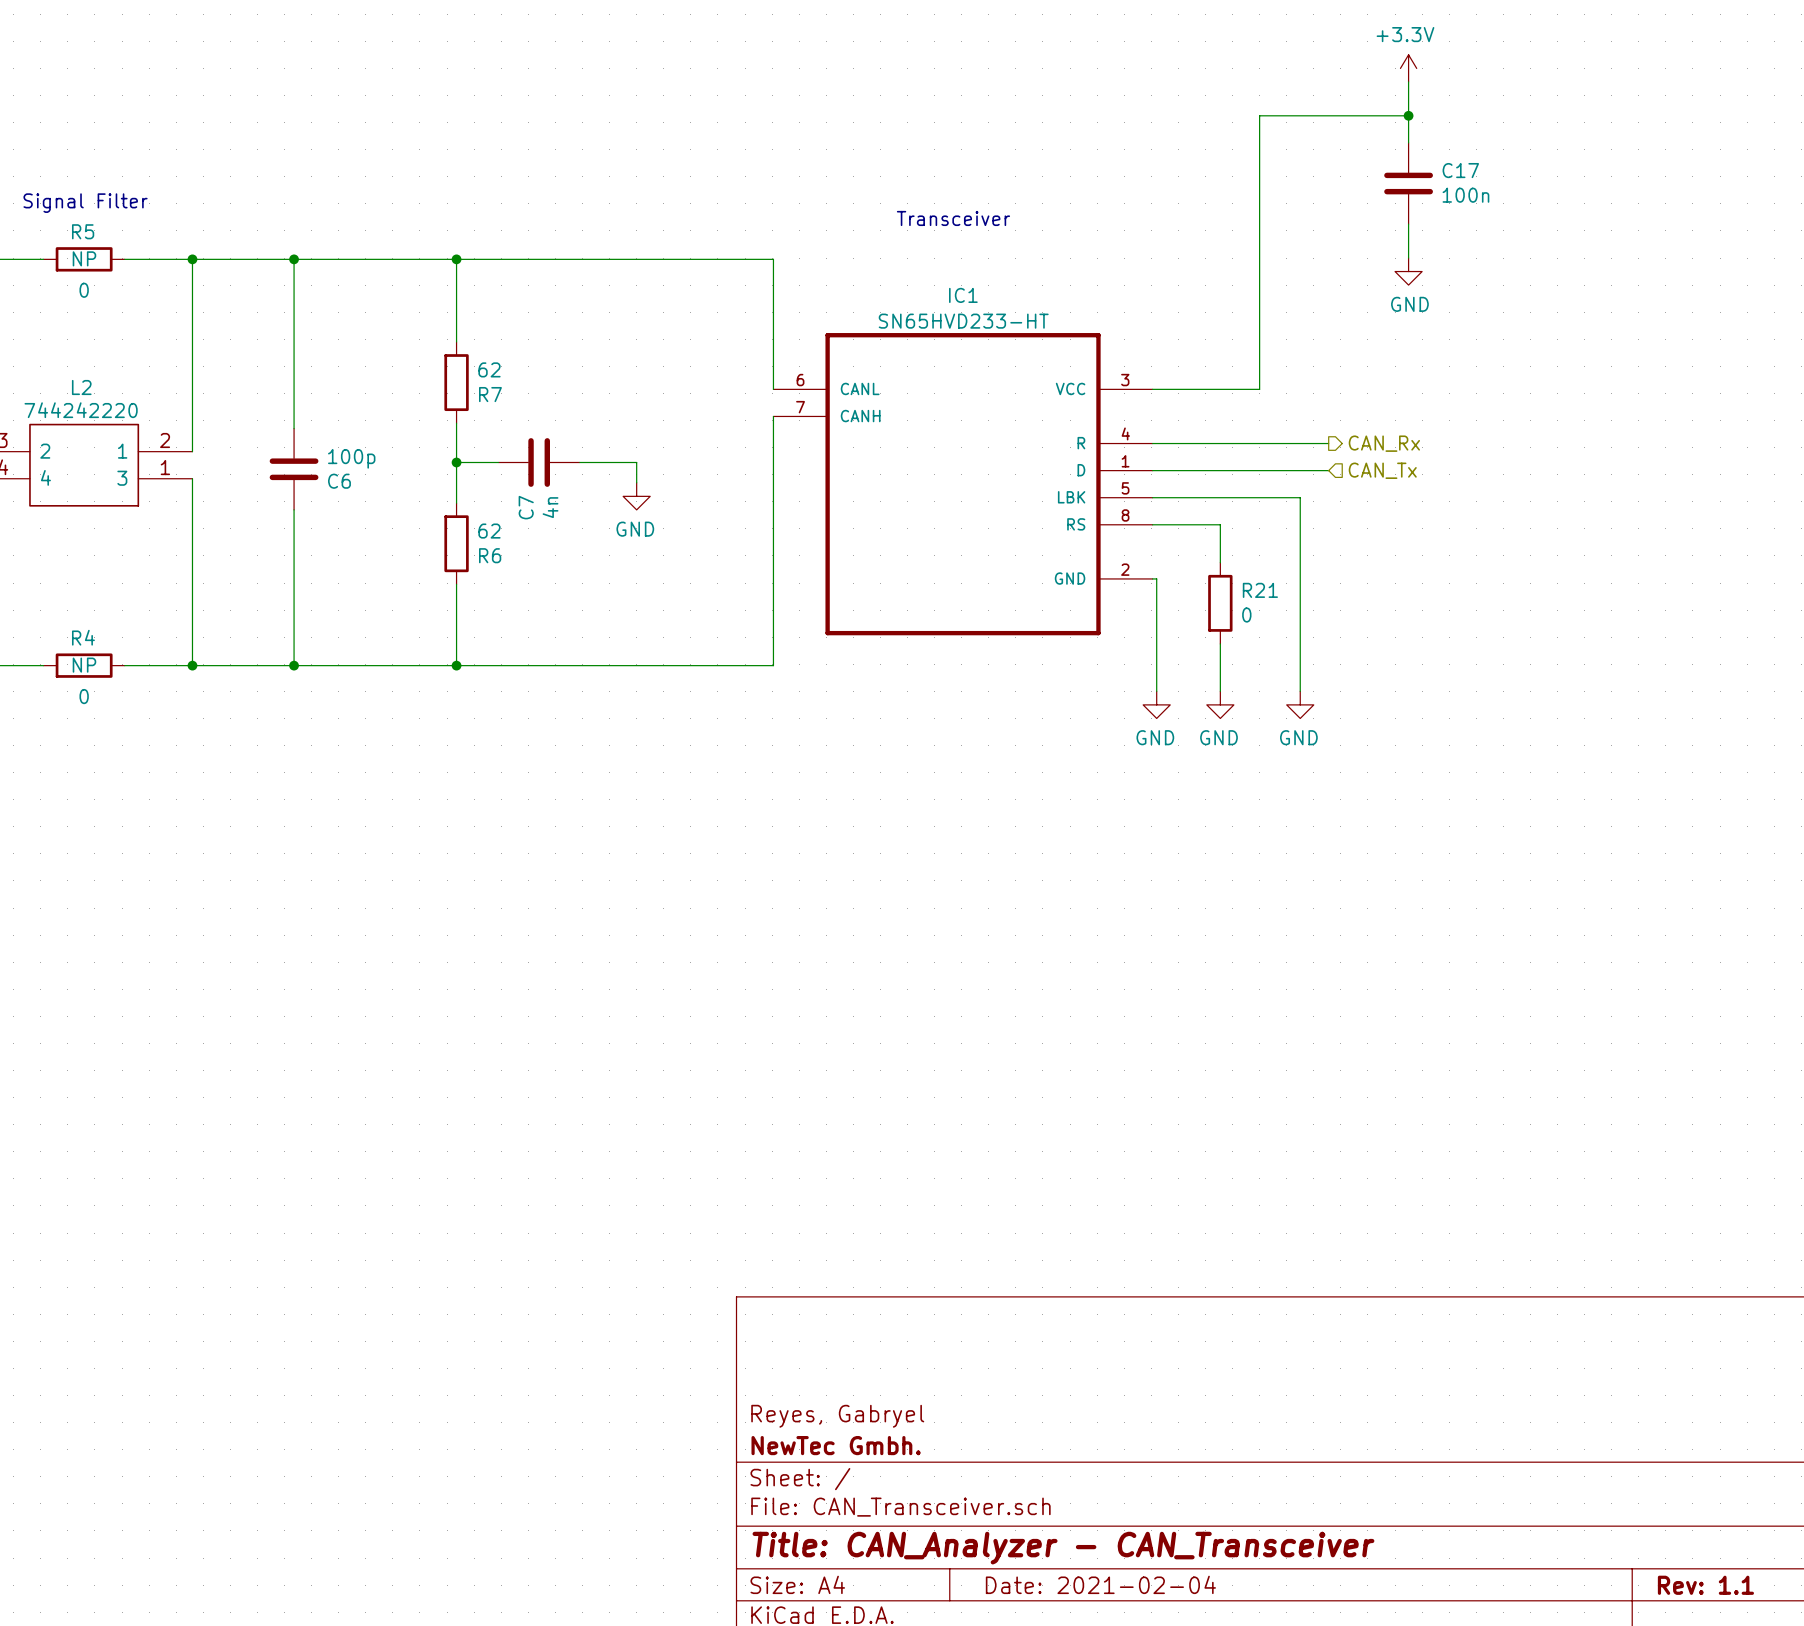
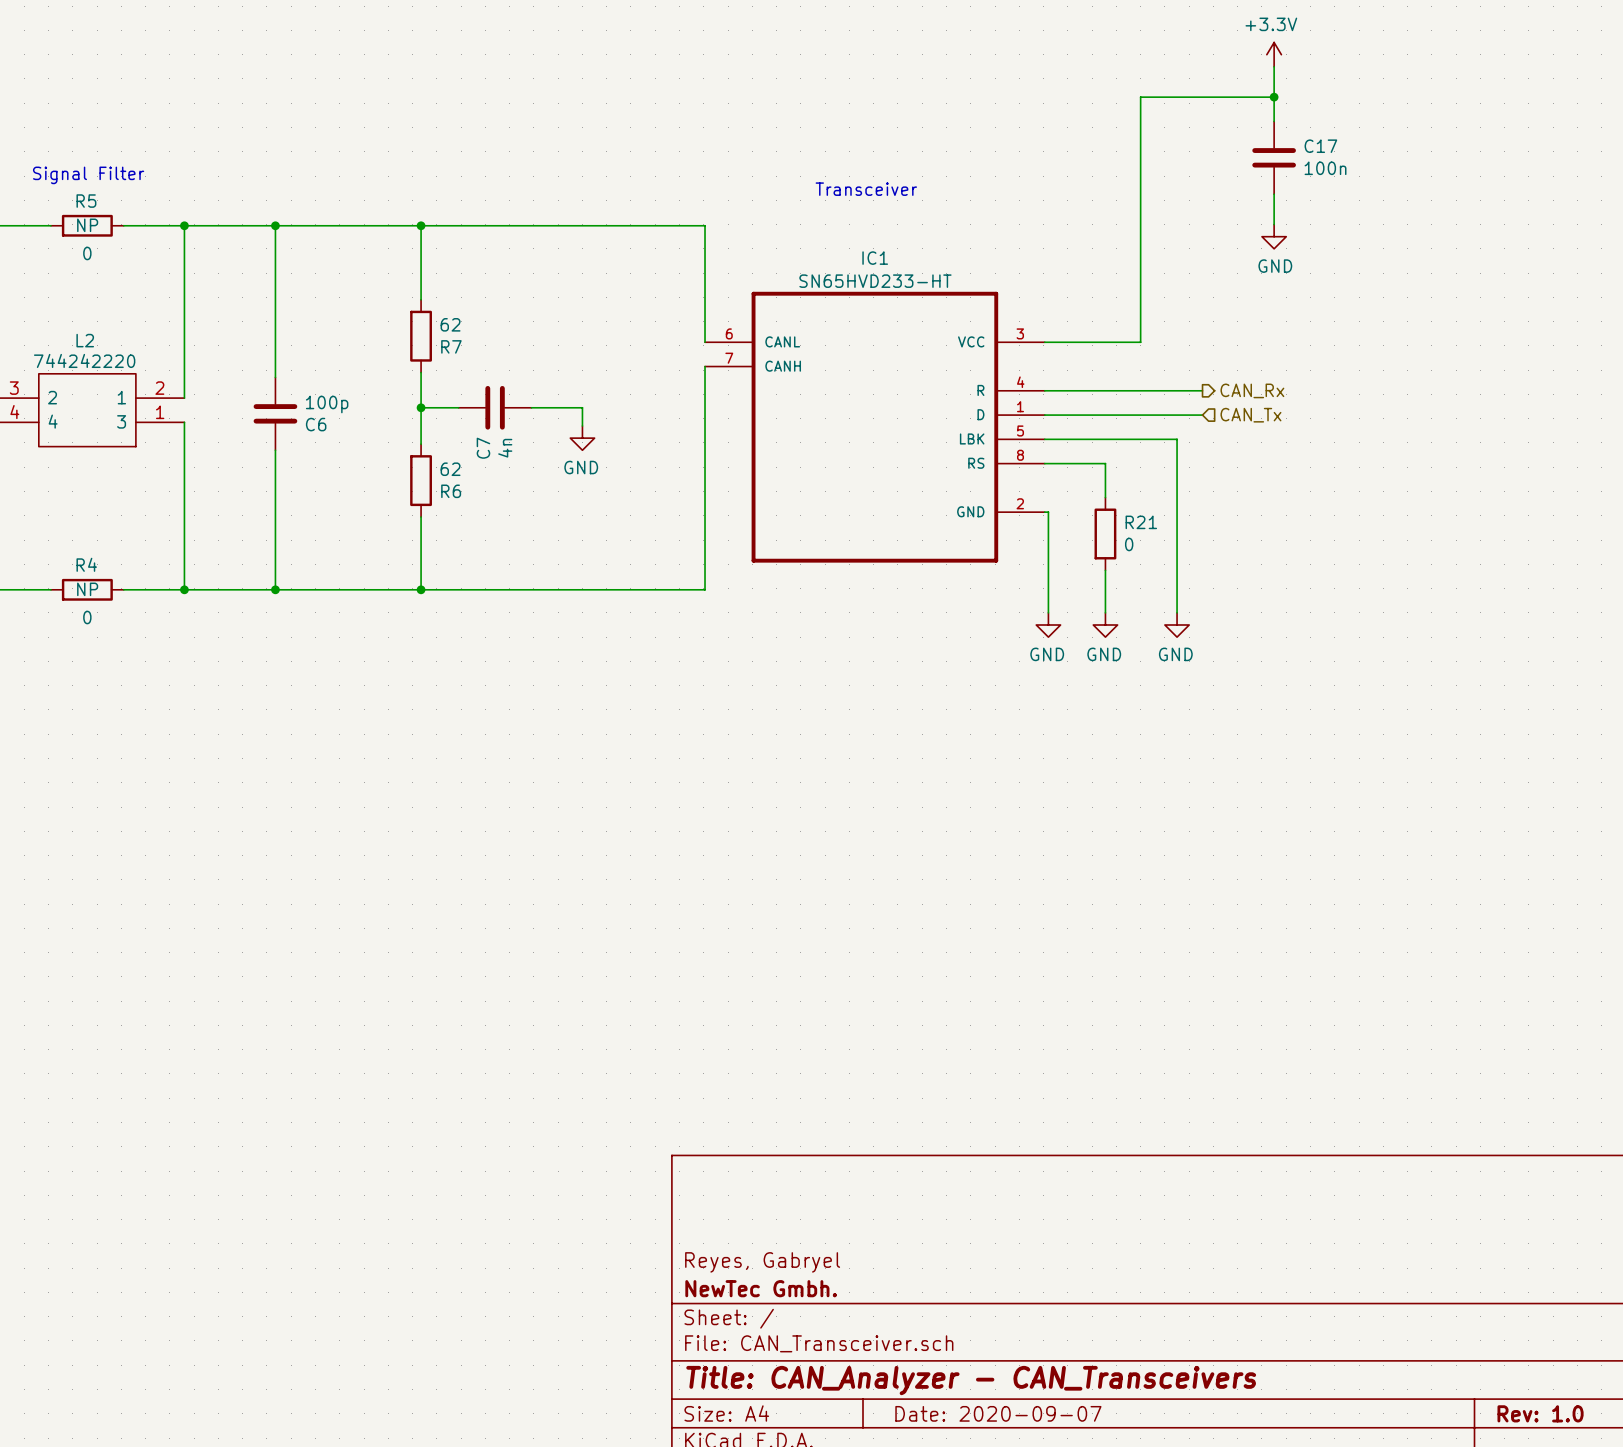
title block: Title: CAN_Analyzer - CAN_Transceiver (1063, 1548) -> Title: CAN_Analyzer - CAN_Transceivers (971, 1380)
title block: Date: 2021-02-04 (1100, 1584) -> Date: 2020-09-07 (998, 1413)
title block: Rev: 1.1 (1705, 1585) -> Rev: 1.0 (1540, 1413)

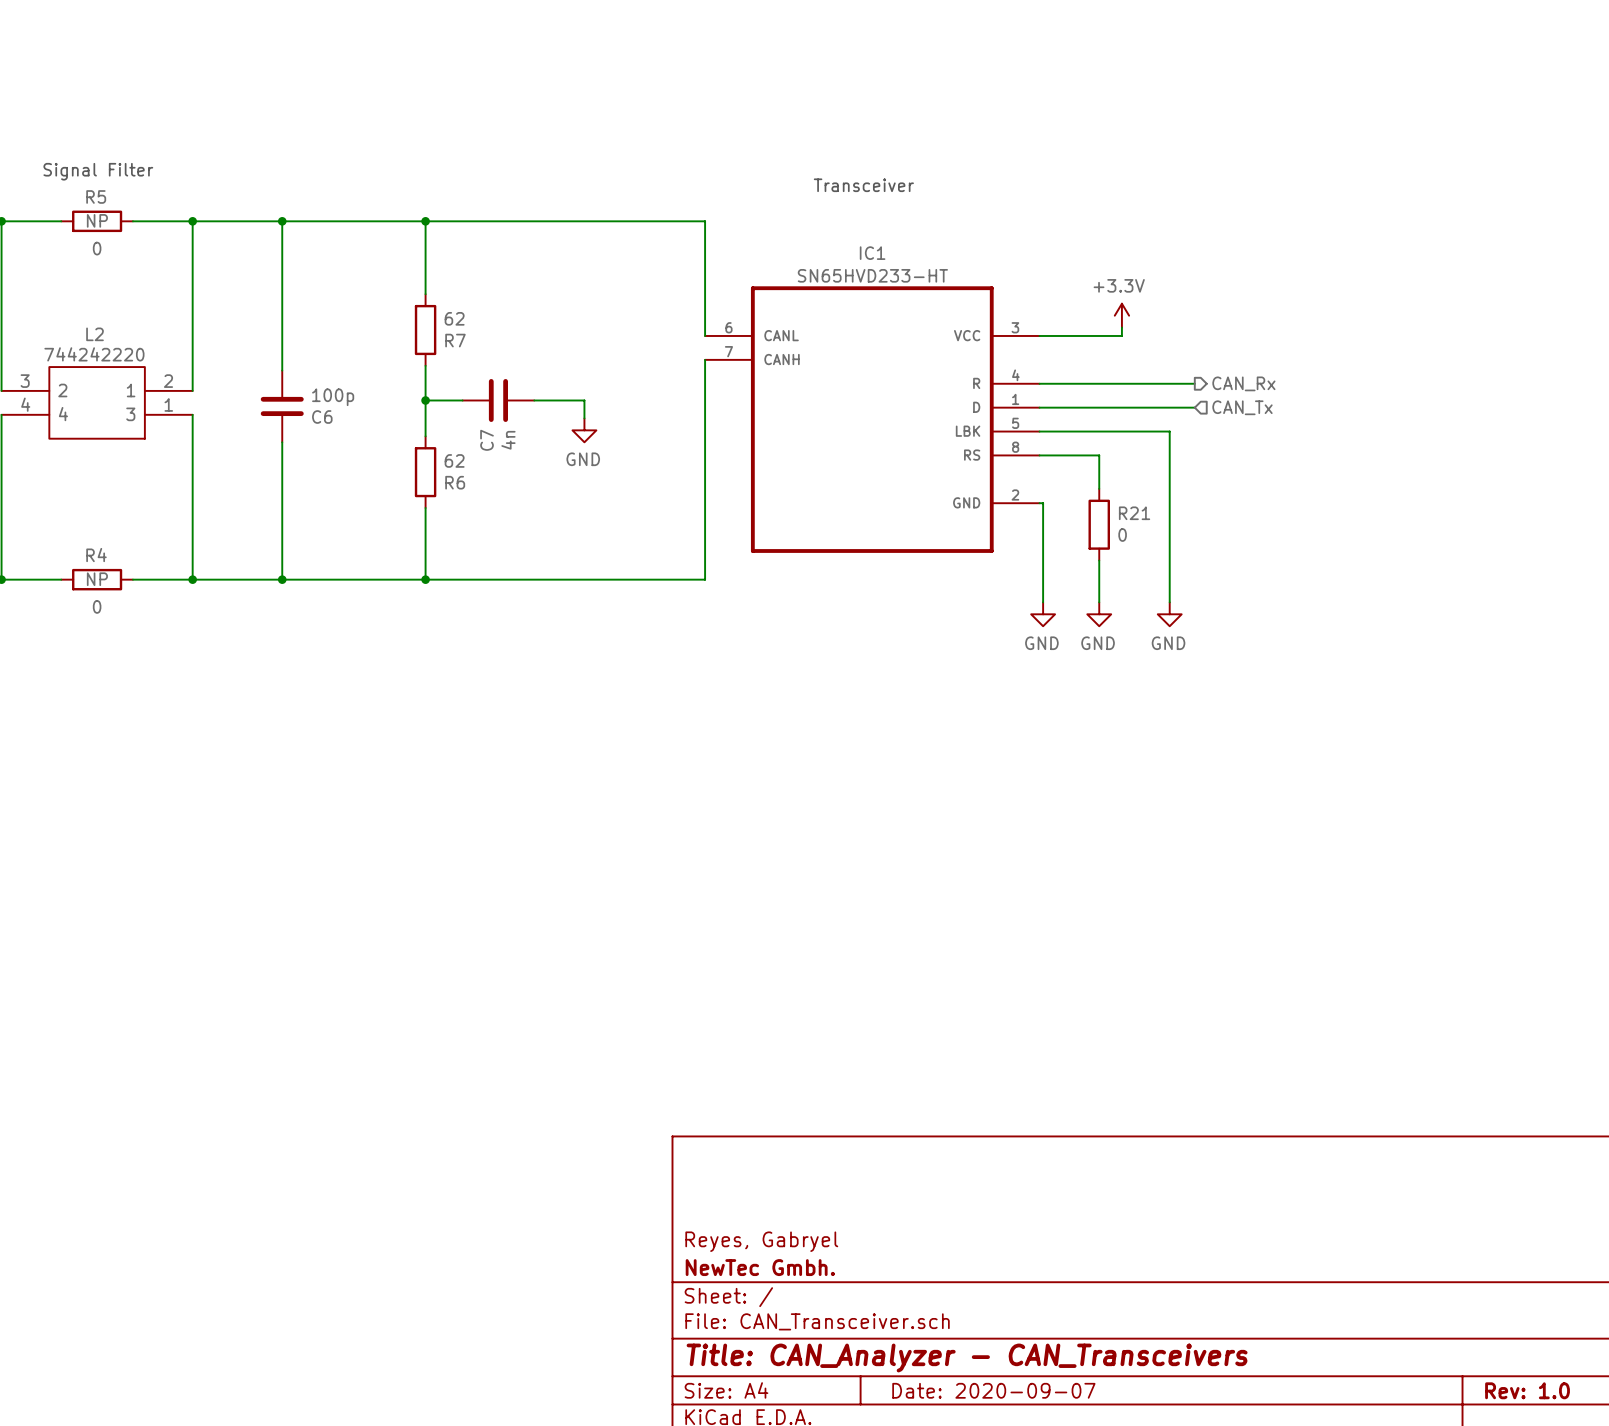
power symbol: +3.3V (1274, 54) -> none
wire: (1274, 66) (1274, 121) -> none
wire: (1274, 97) (1140, 97) (1140, 342) (1128, 342) -> (1121, 327) (1121, 335)
junction: (1274, 97) -> none
C17: 100n (1274, 157) -> none
wire: (1274, 194) (1274, 224) -> none
power symbol: GND (1274, 236) -> none
power symbol: none -> +3.3V (1121, 315)

